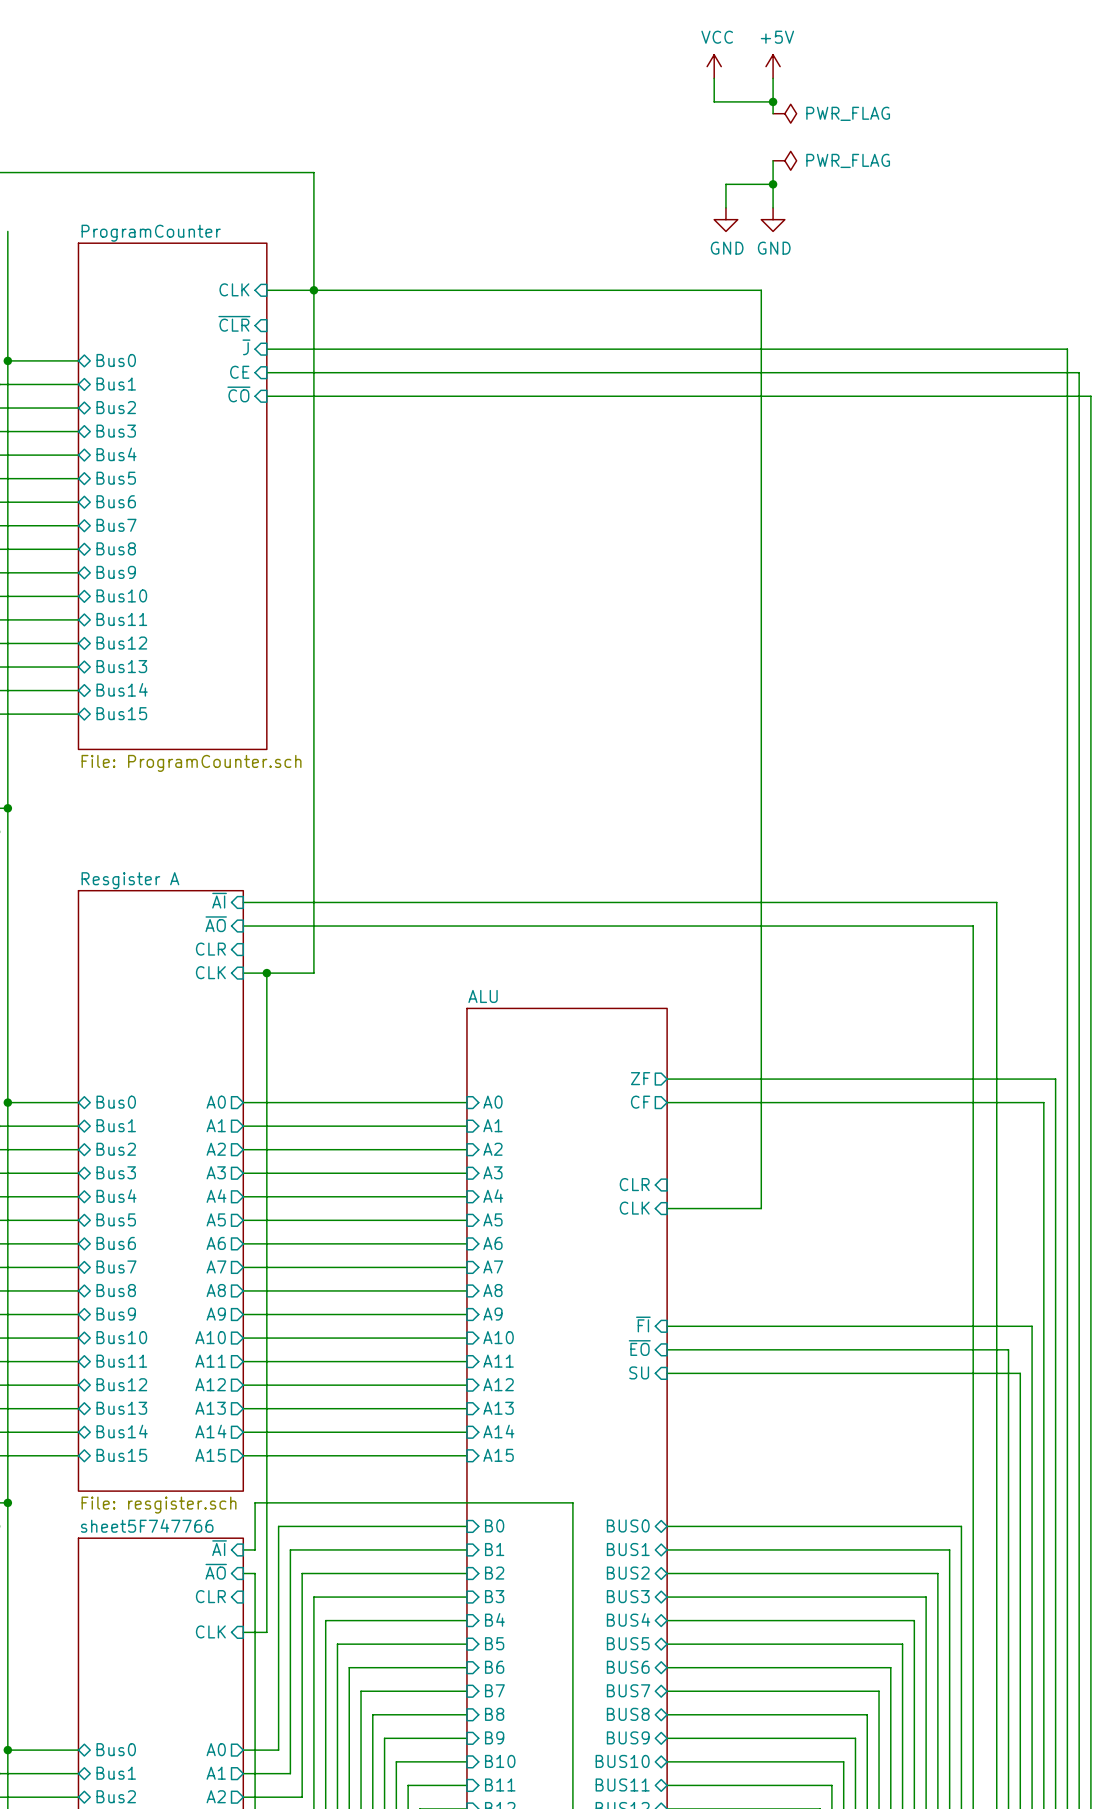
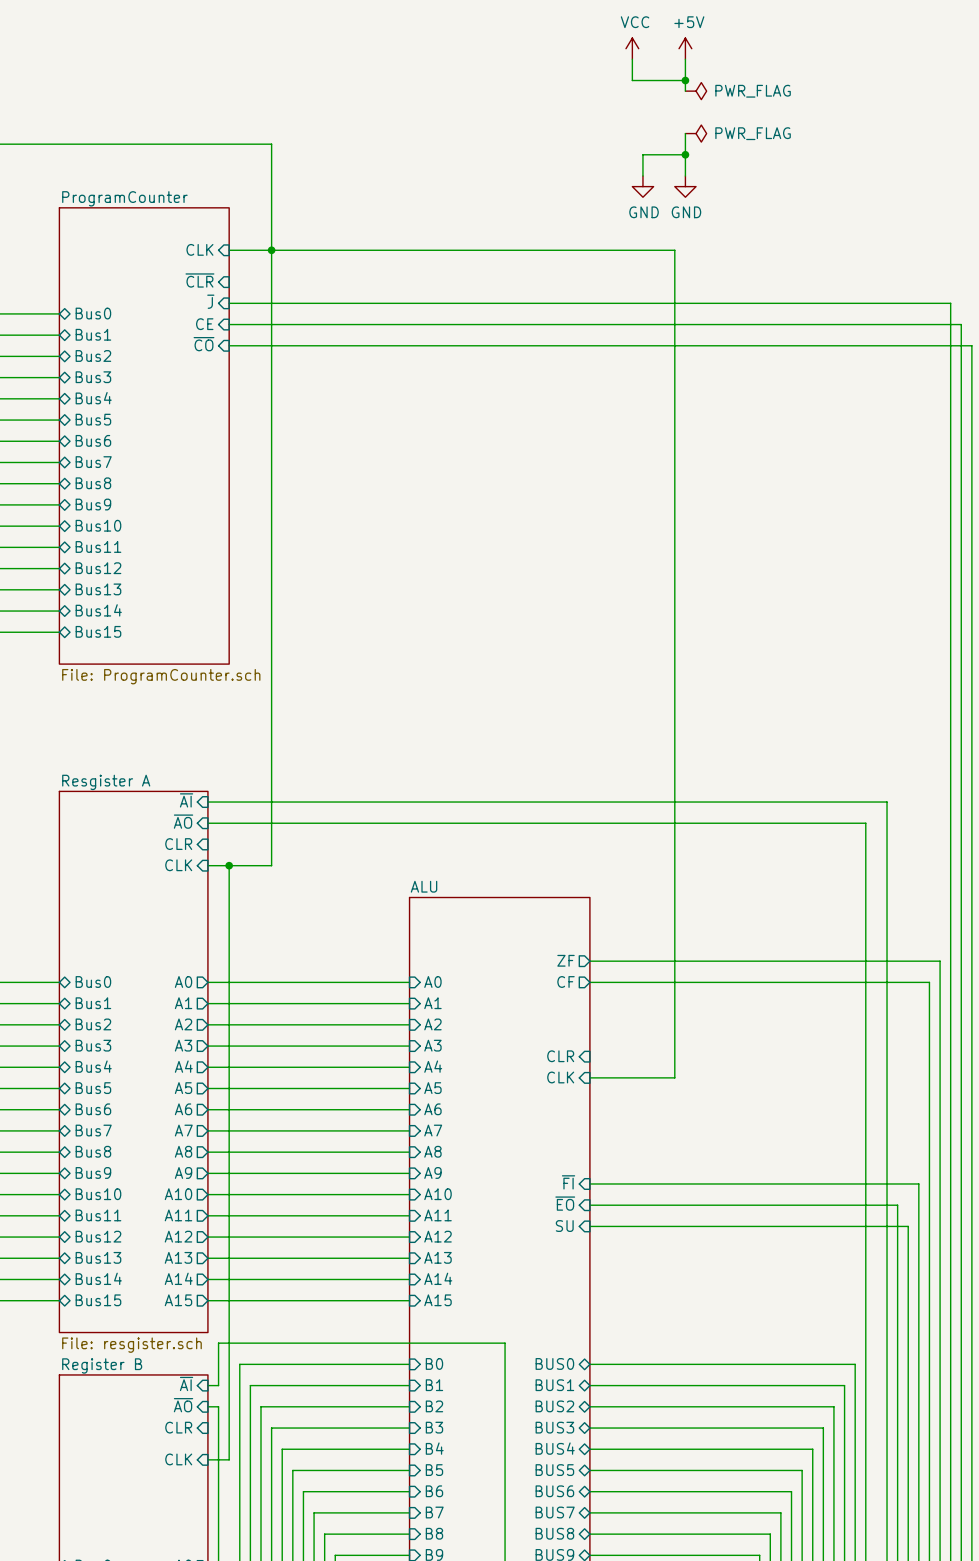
sheet sheet5F747766 name: sheet5F747766 (147, 1525) -> Register B (102, 1365)

